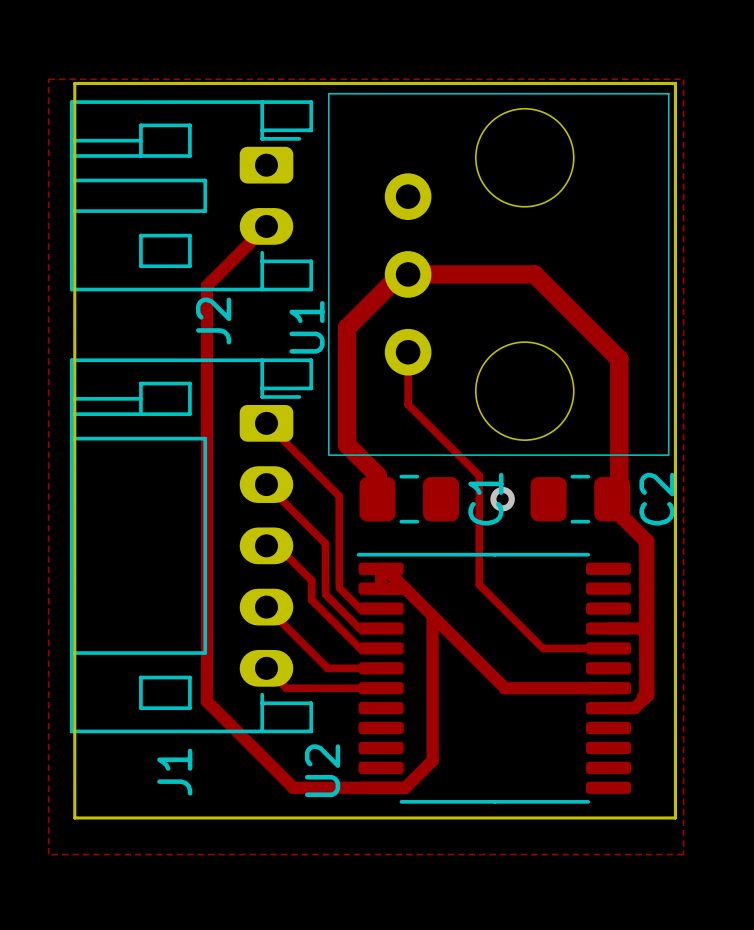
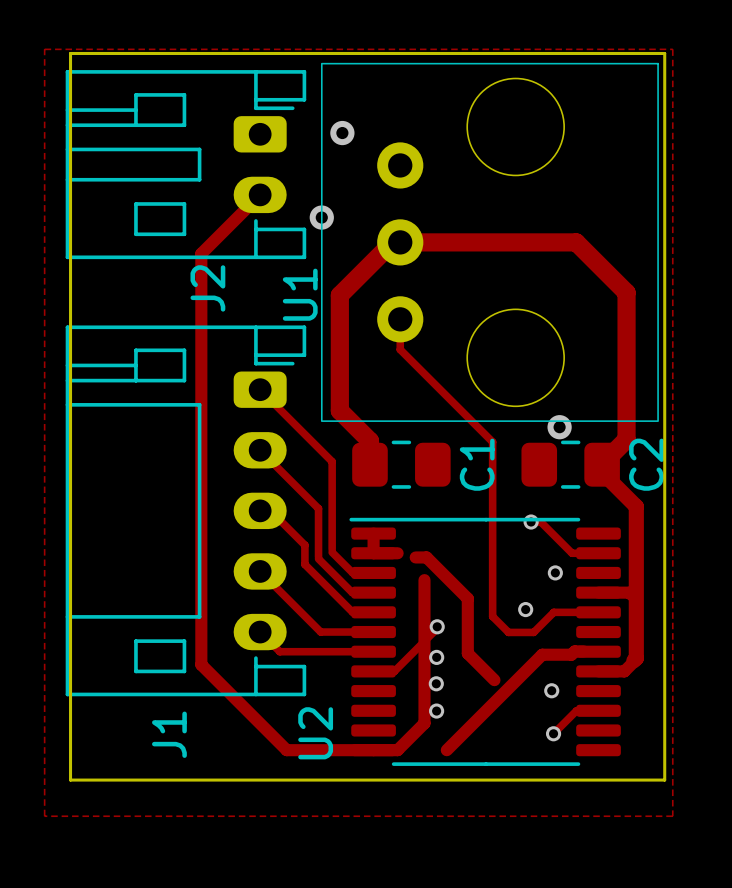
via: none -> (342, 133)
via: none -> (321, 217)
track: (534, 274) (619, 359) (619, 491) -> (525, 242) (576, 242) (626, 292) (626, 439) (609, 457)
track: (408, 382) (408, 404) (479, 475) (479, 584) (542, 648) (563, 648) -> (400, 349) (492, 442) (492, 616) (508, 632) (533, 632) (553, 612)
via position: (502, 499) -> (559, 427)
track: none -> (531, 522) (540, 522) (572, 553) (598, 553)
via: none -> (531, 522)
track: (385, 568) (504, 688) (613, 688) -> none
track: none -> (415, 557) (426, 557) (467, 598) (467, 653) (494, 680)
via: none -> (555, 572)
via: none -> (525, 609)
track: none -> (437, 626) (394, 671) (373, 671)
via: none -> (437, 626)
track: none -> (583, 651) (574, 651) (571, 654) (542, 654) (446, 750)
via: none -> (436, 657)
via: none -> (436, 683)
via: none -> (551, 690)
track: none -> (598, 710) (576, 710) (553, 733)
via: none -> (436, 711)
via: none -> (553, 733)

